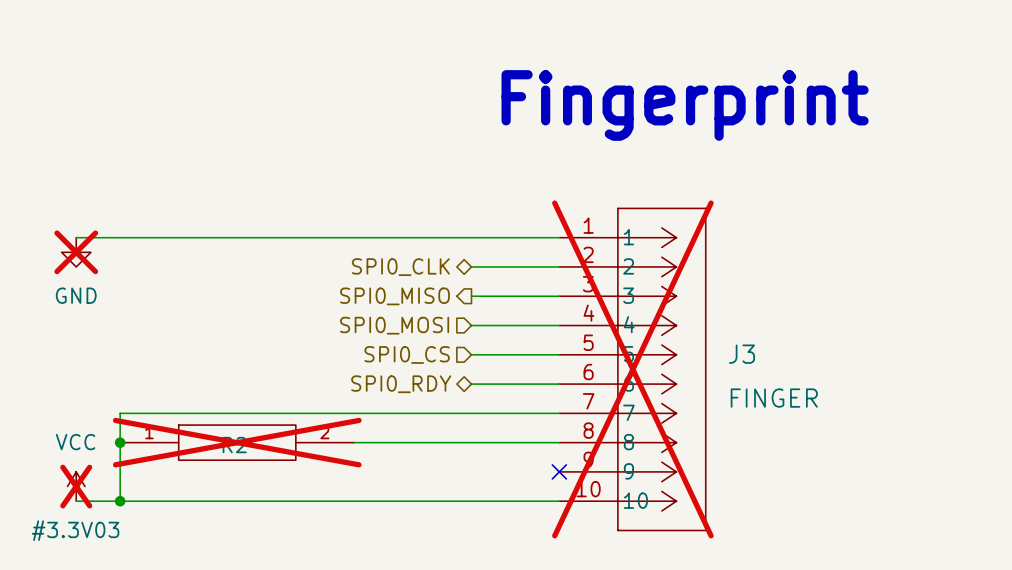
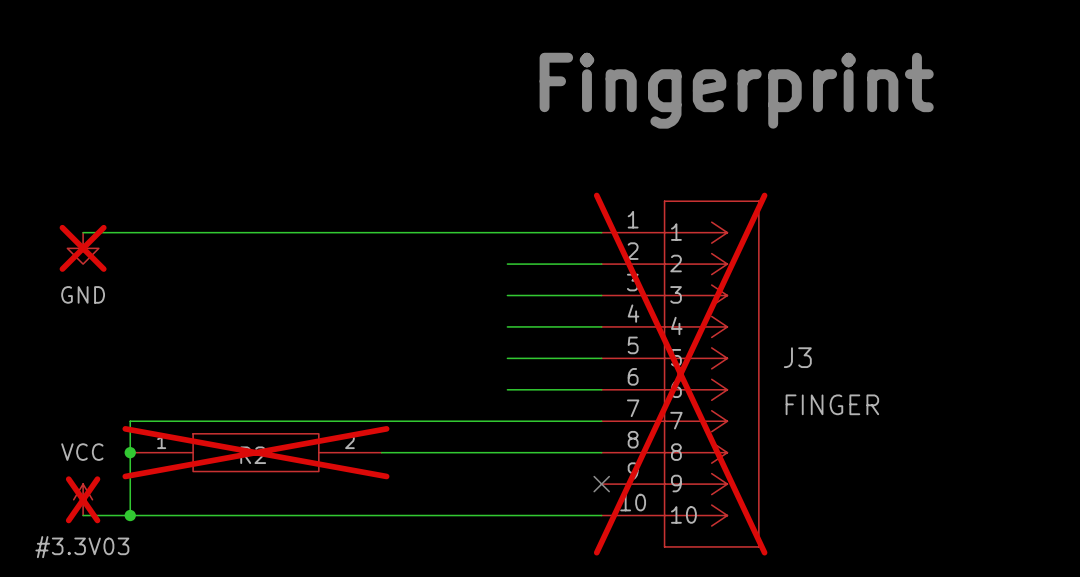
hierarchical label: SPI0_CLK (400, 267) -> none
hierarchical label: SPI0_MISO (394, 296) -> none
hierarchical label: SPI0_MOSI (394, 325) -> none
hierarchical label: SPI0_CS (407, 354) -> none
hierarchical label: SPI0_RDY (401, 384) -> none

